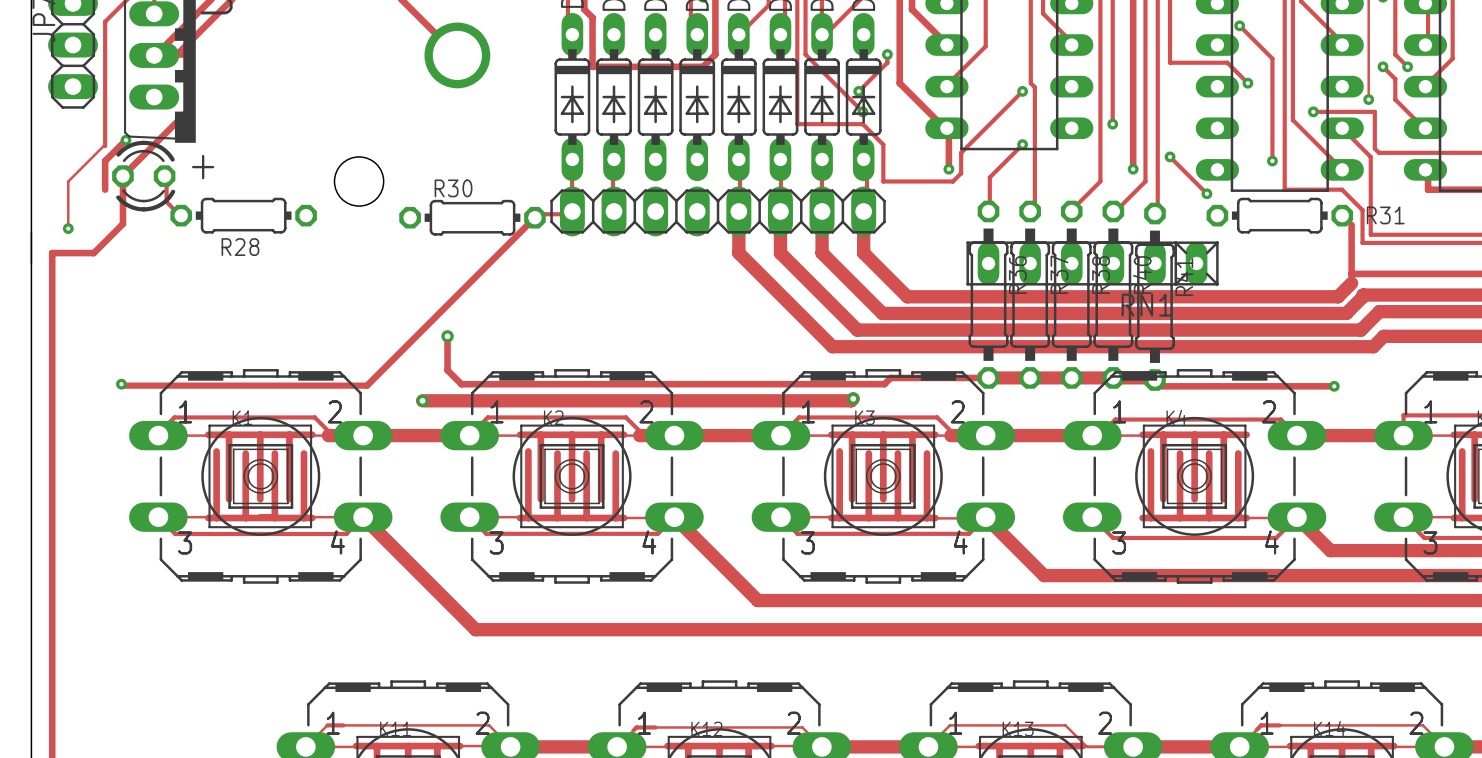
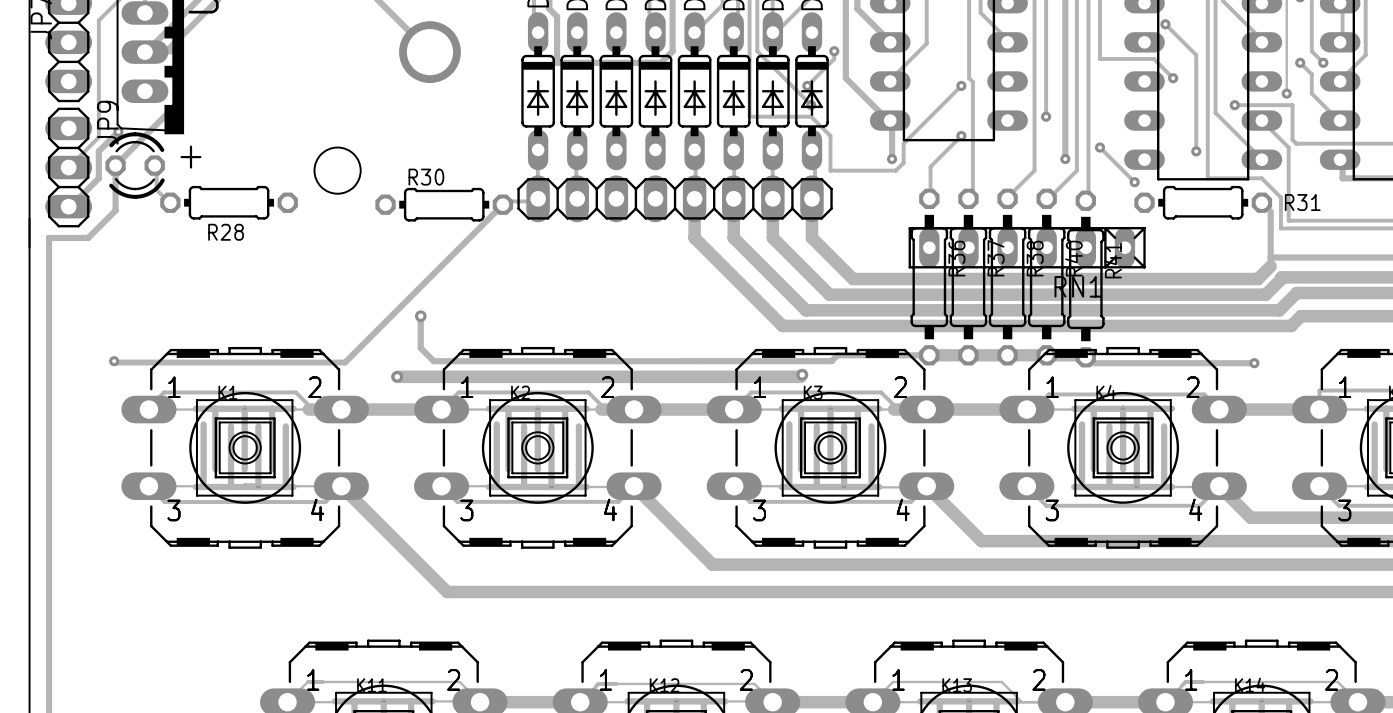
track: (105, 146) (68, 181) (68, 228) -> (98, 137) (68, 167)
JP9: none -> (68, 167)
track: none -> (98, 178) (68, 206)
via: (68, 228) -> none

